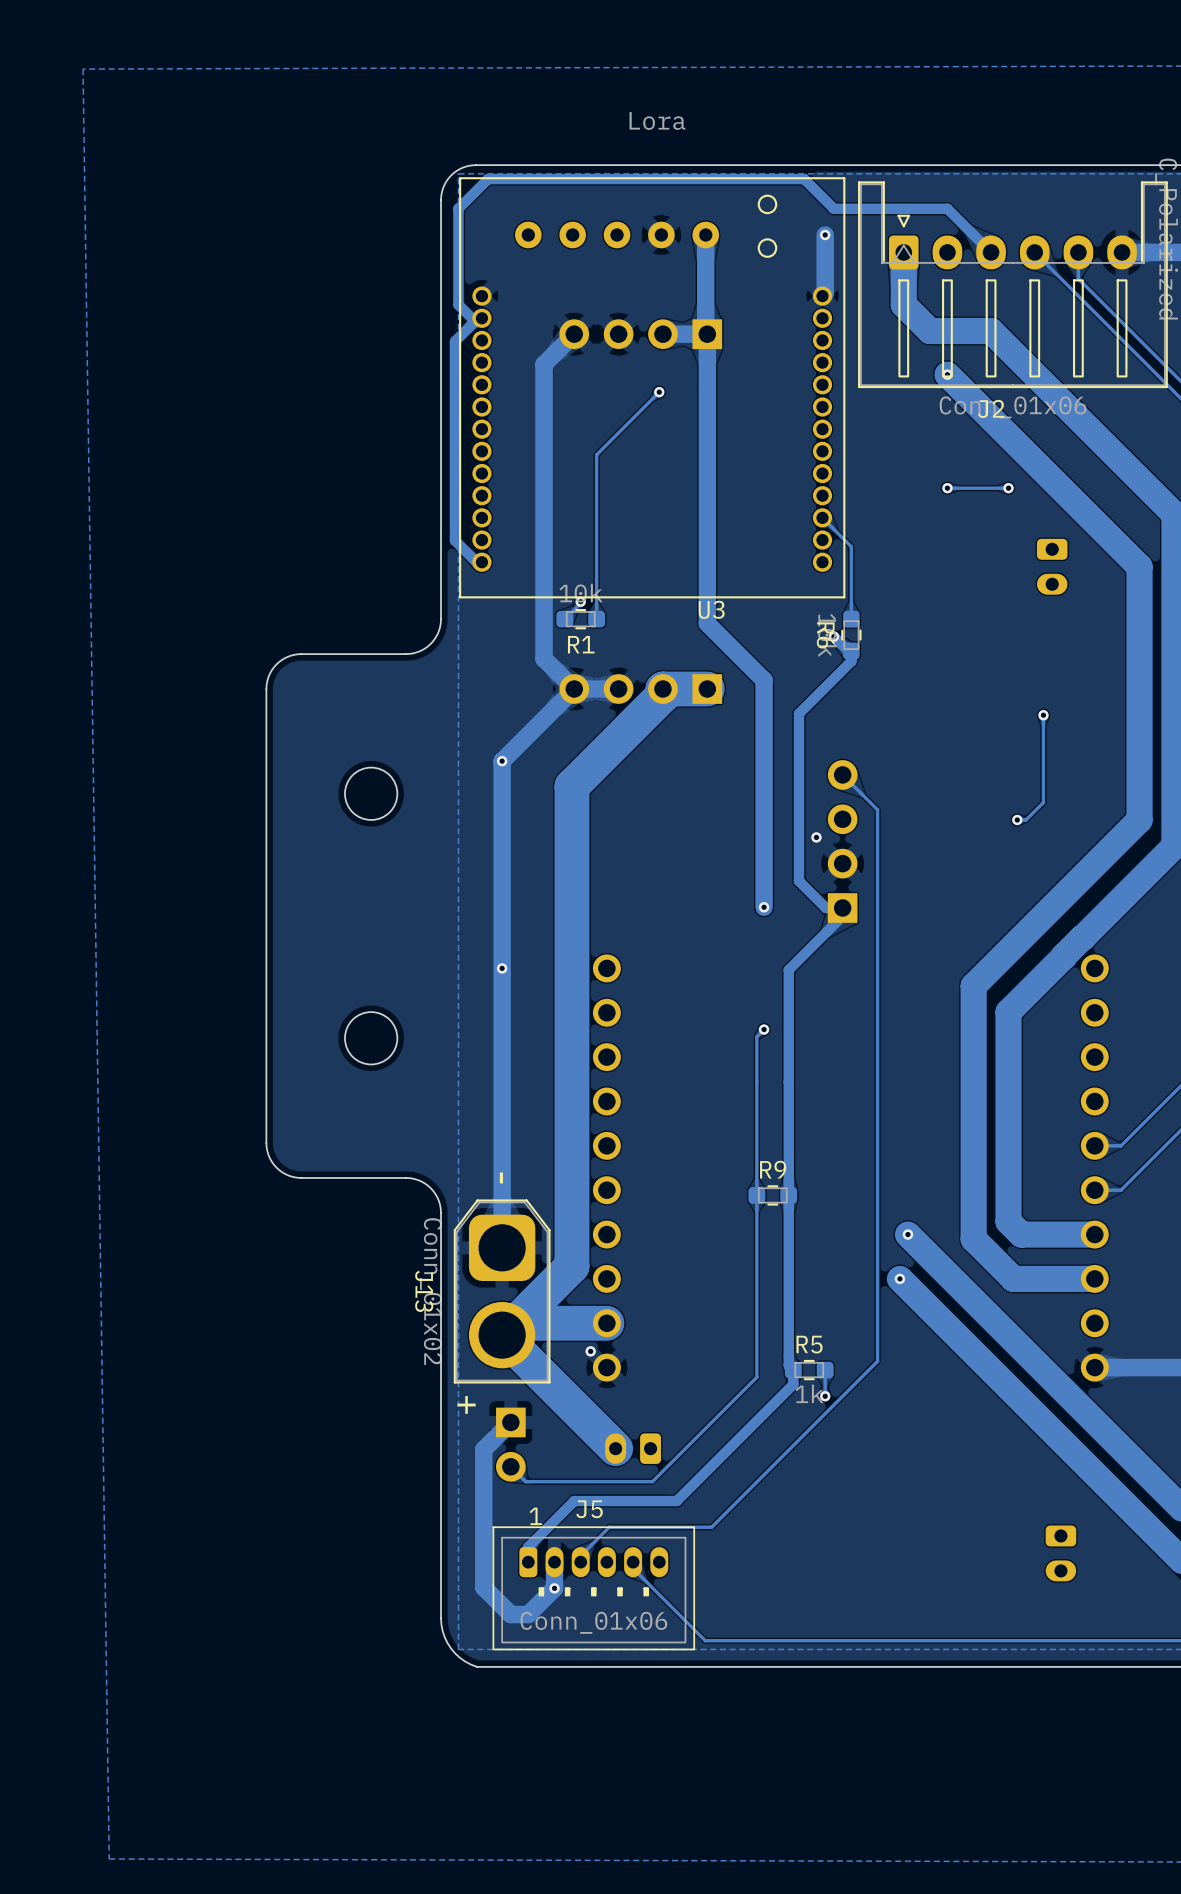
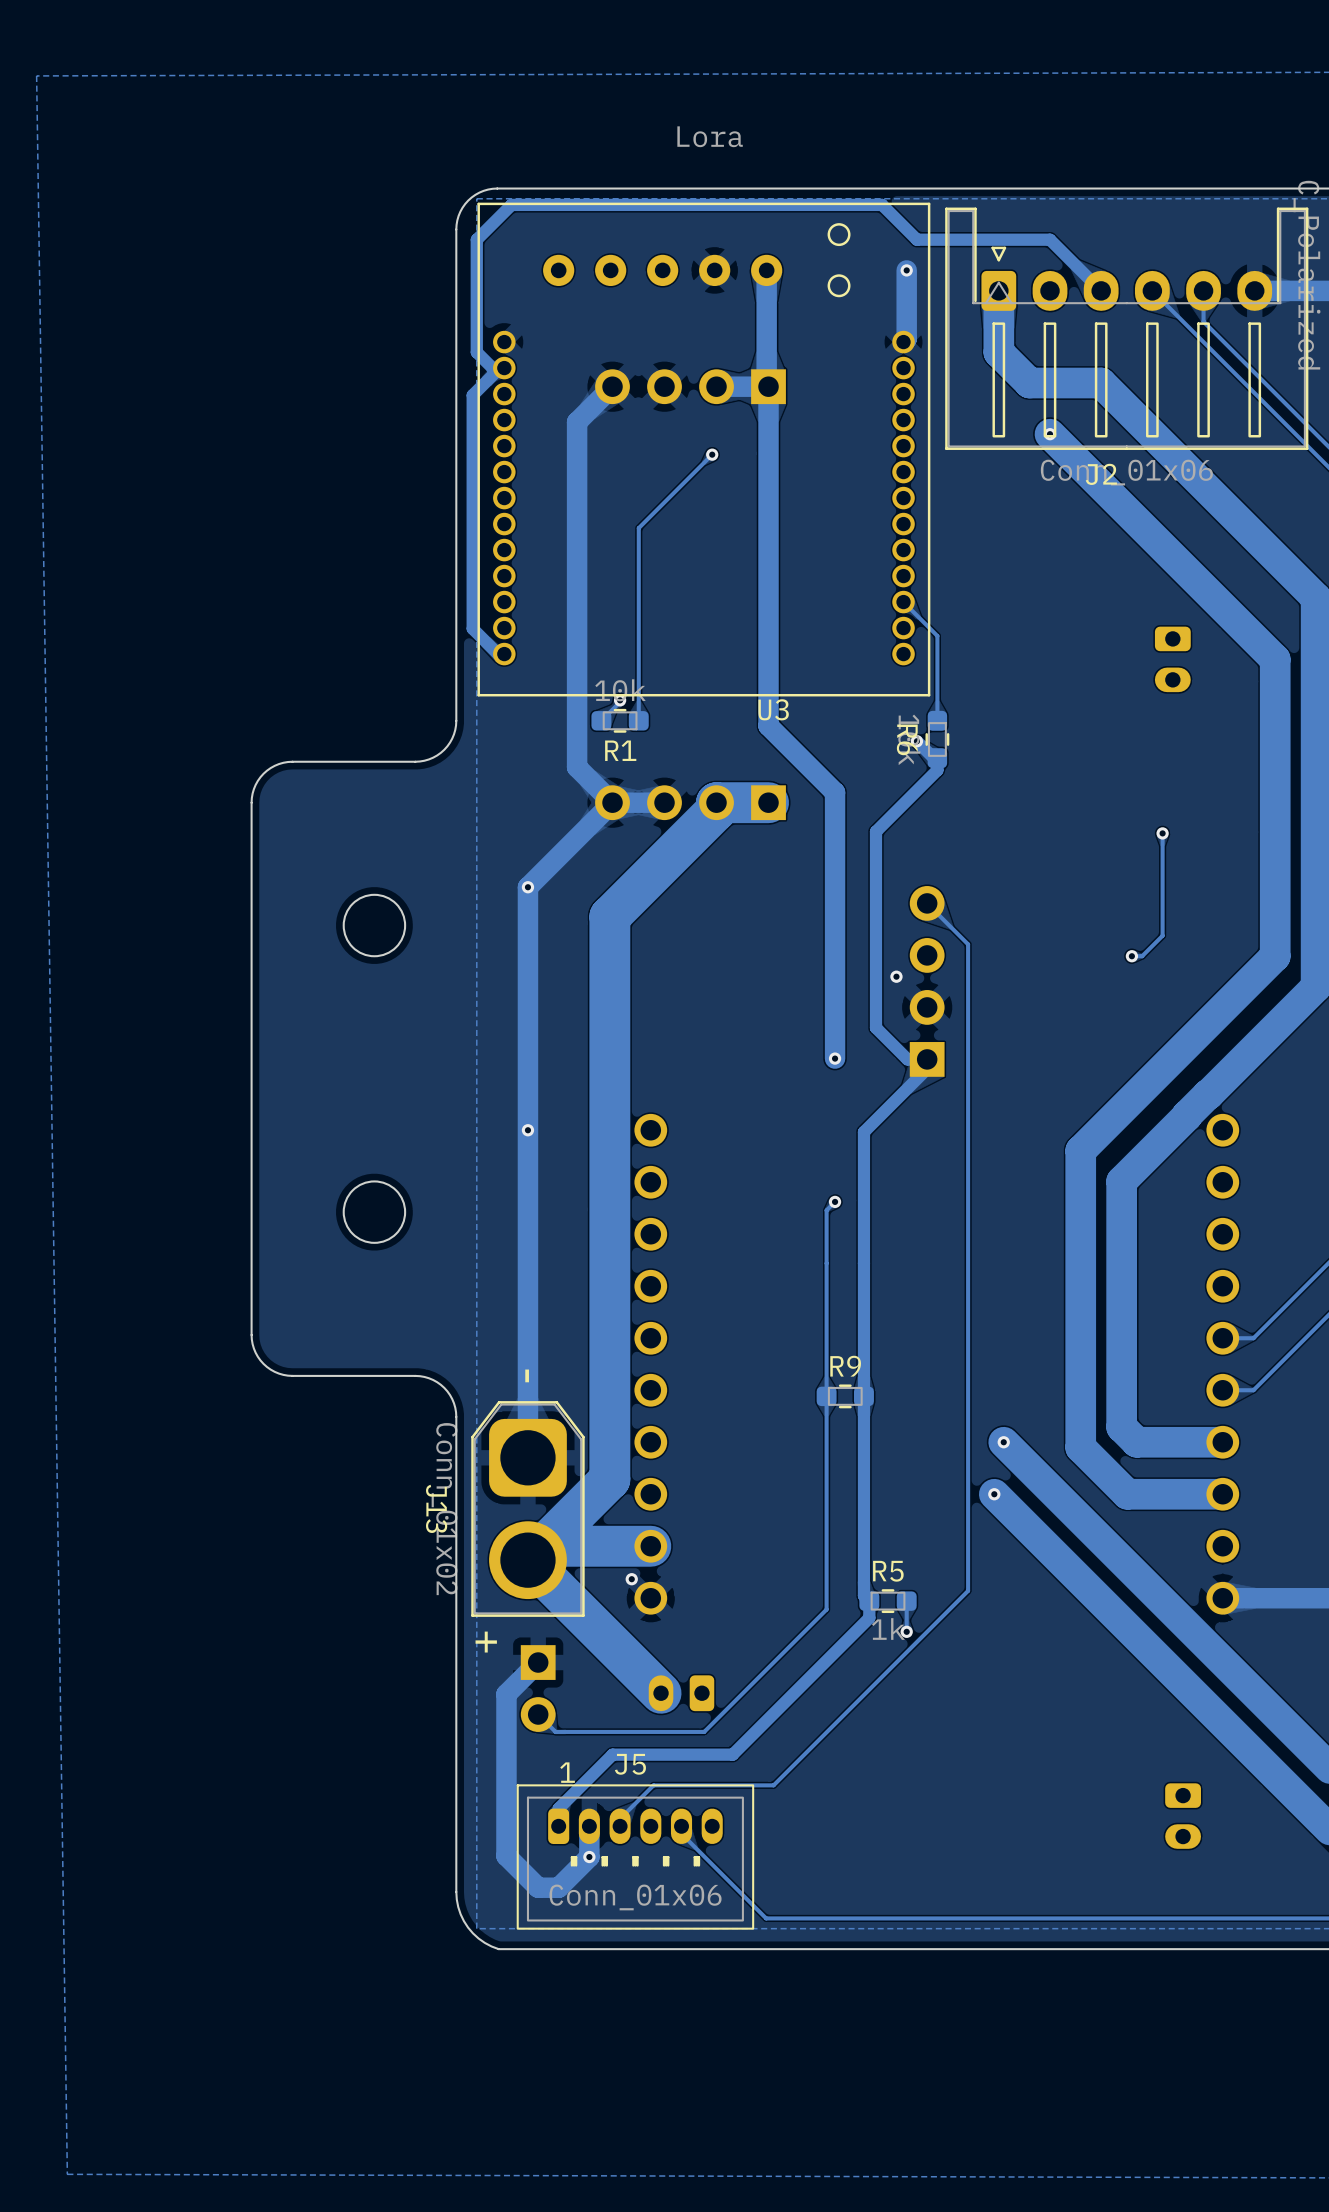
via: (947, 488) -> none
track: (1008, 488) (947, 488) -> none
via: (1008, 488) -> none

